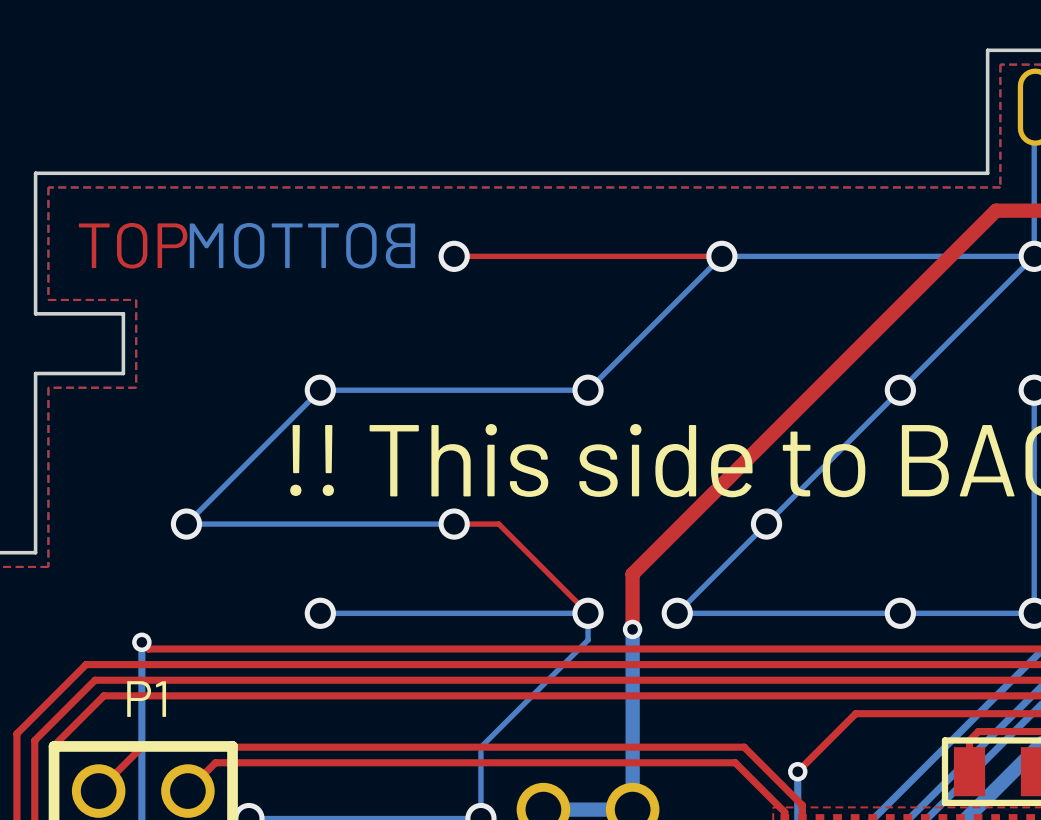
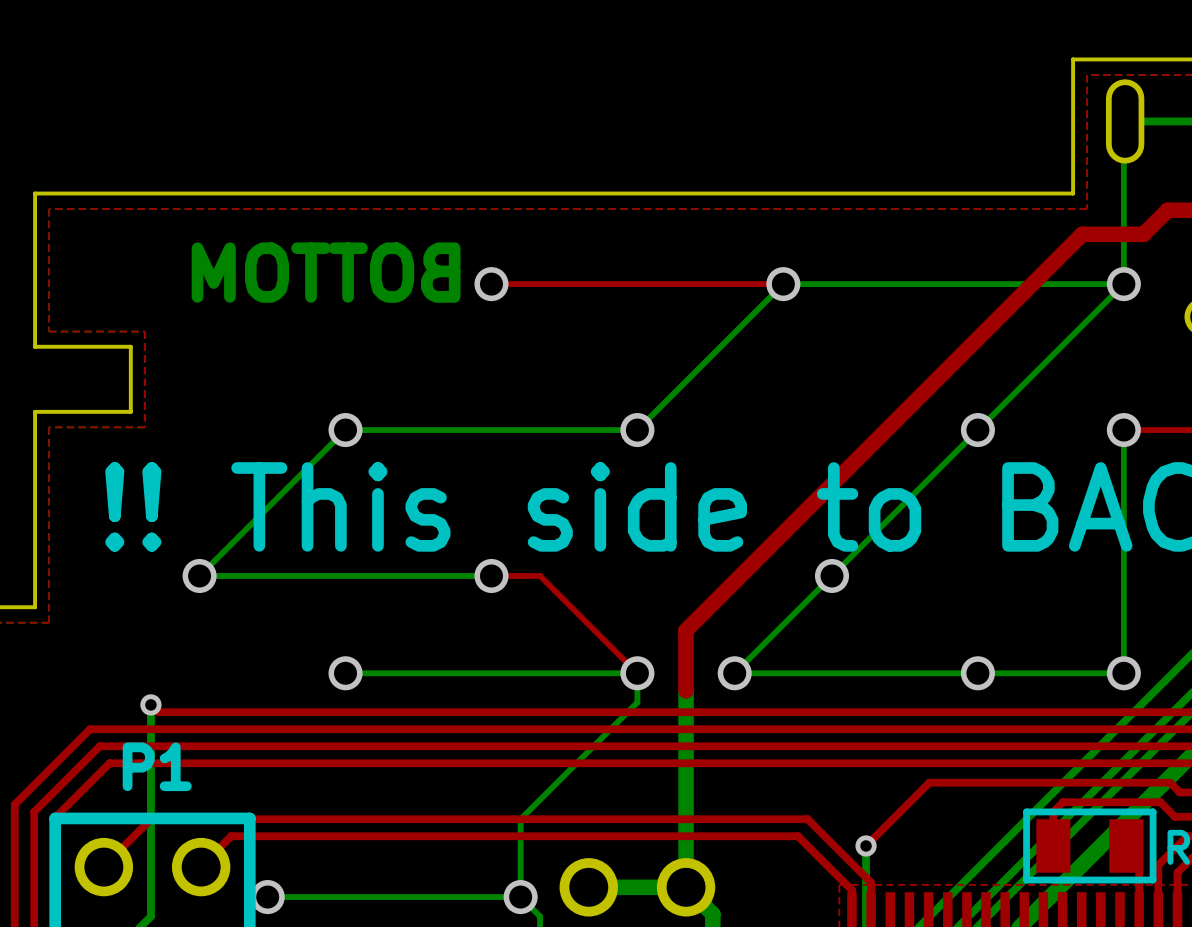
text: TOP (133, 245) -> none
via: (632, 629) -> none

